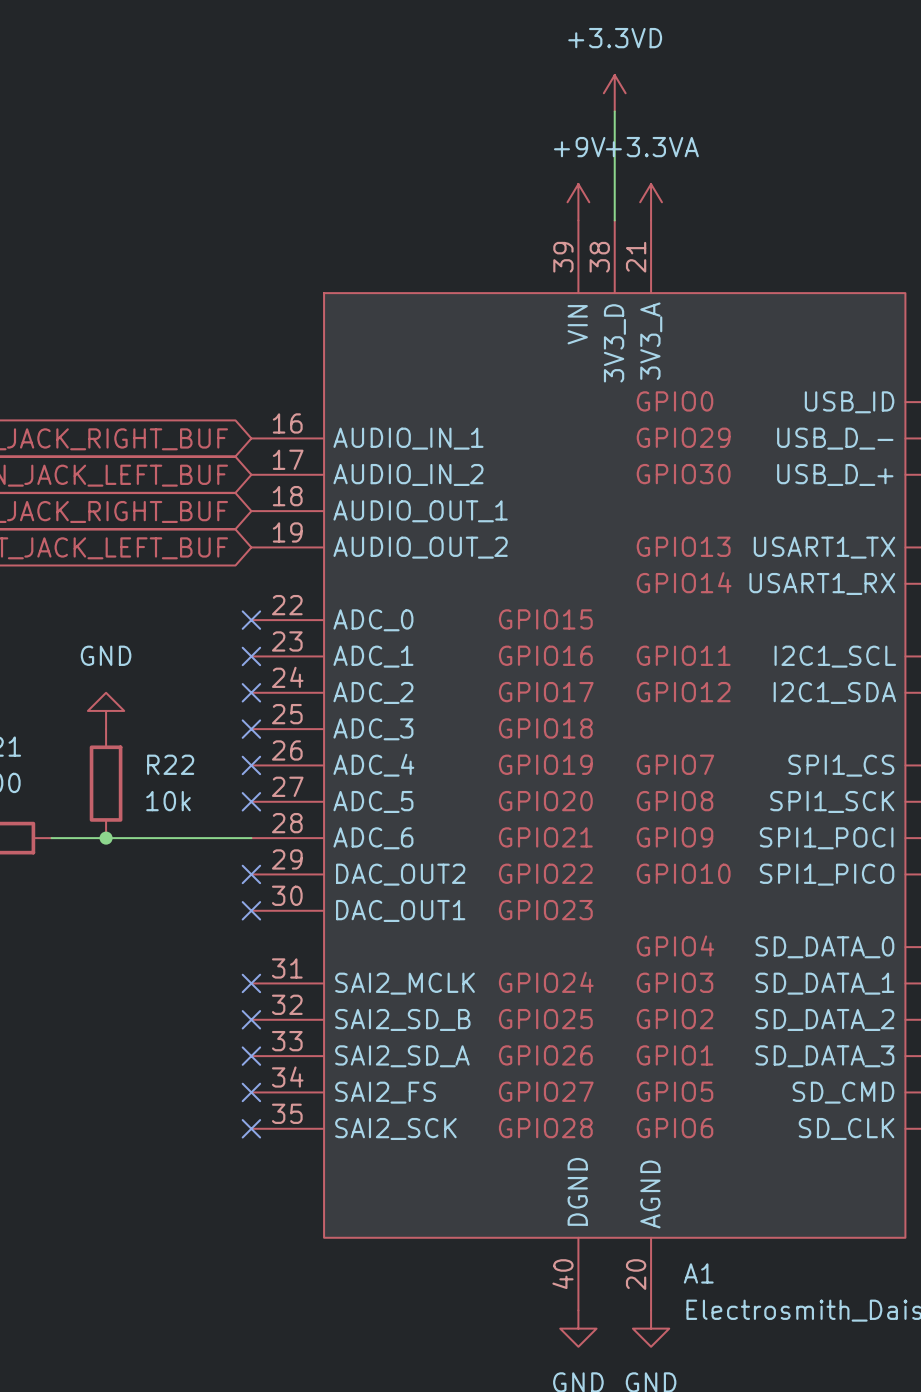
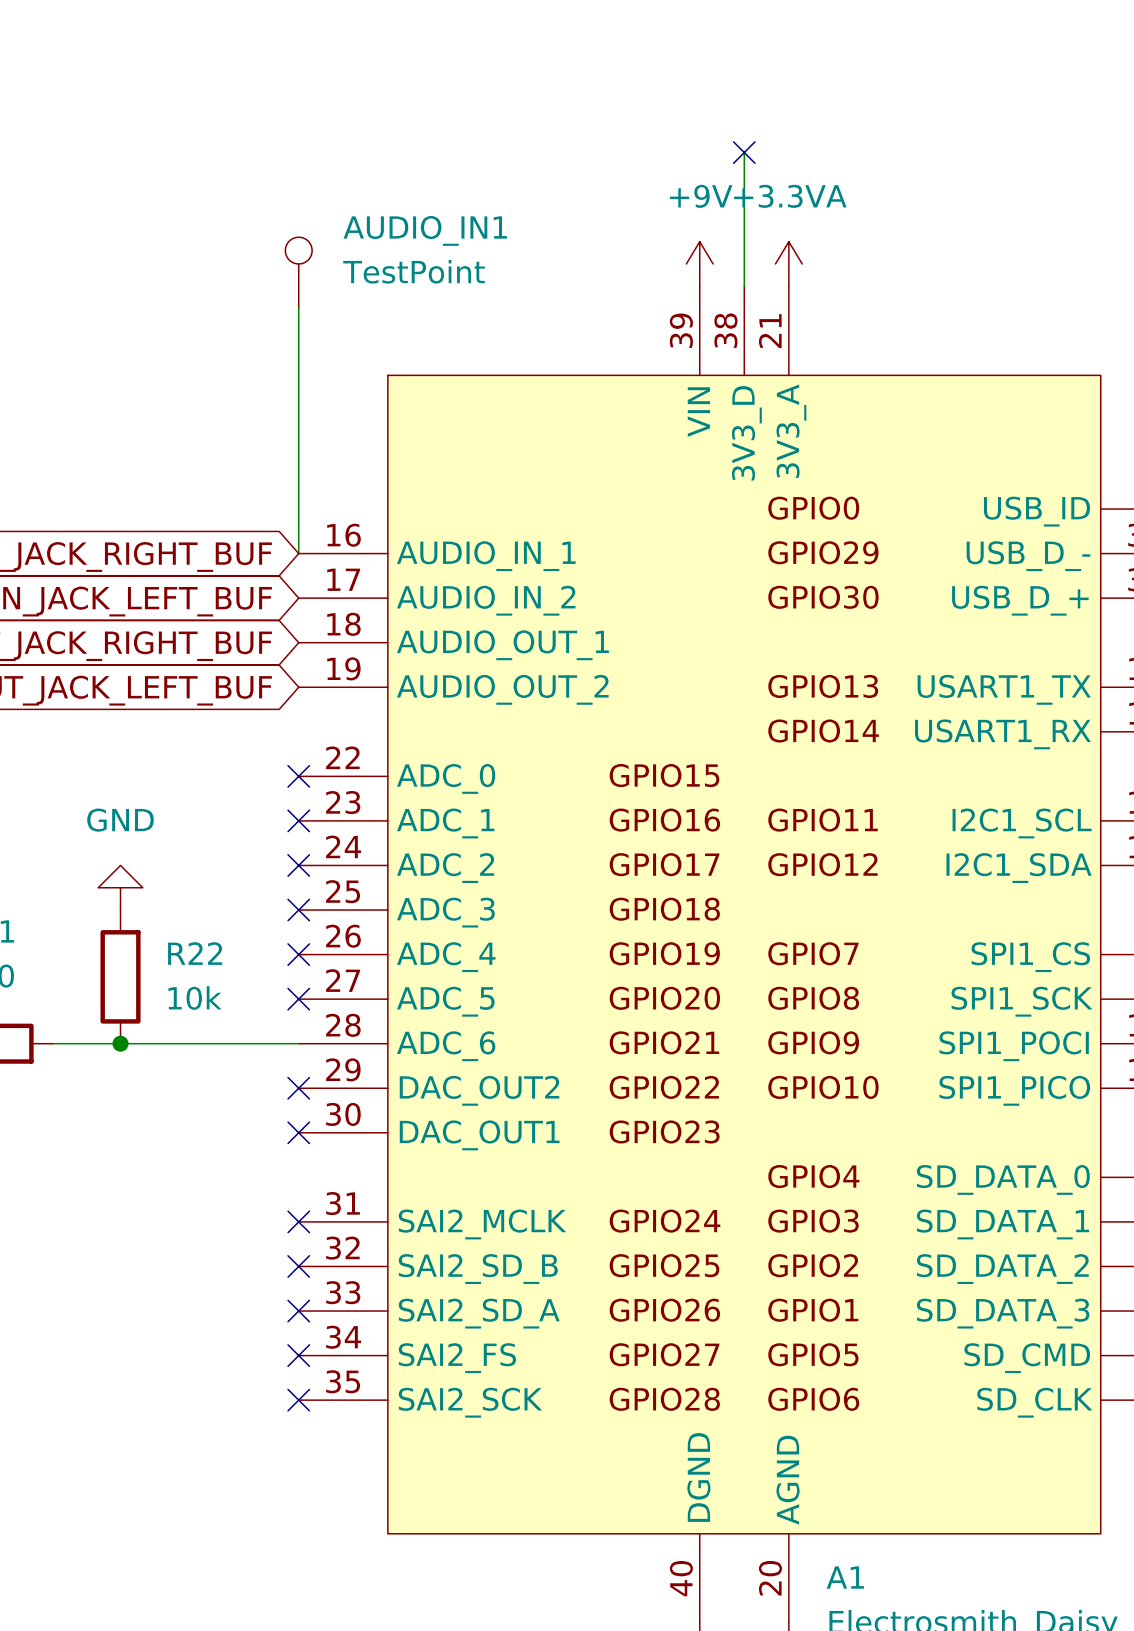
power symbol: +3.3VD (614, 93) -> none
no-connect mark: none -> (744, 152)
AUDIO_IN1: none -> TestPoint (298, 272)
wire: none -> (298, 308) (298, 553)

